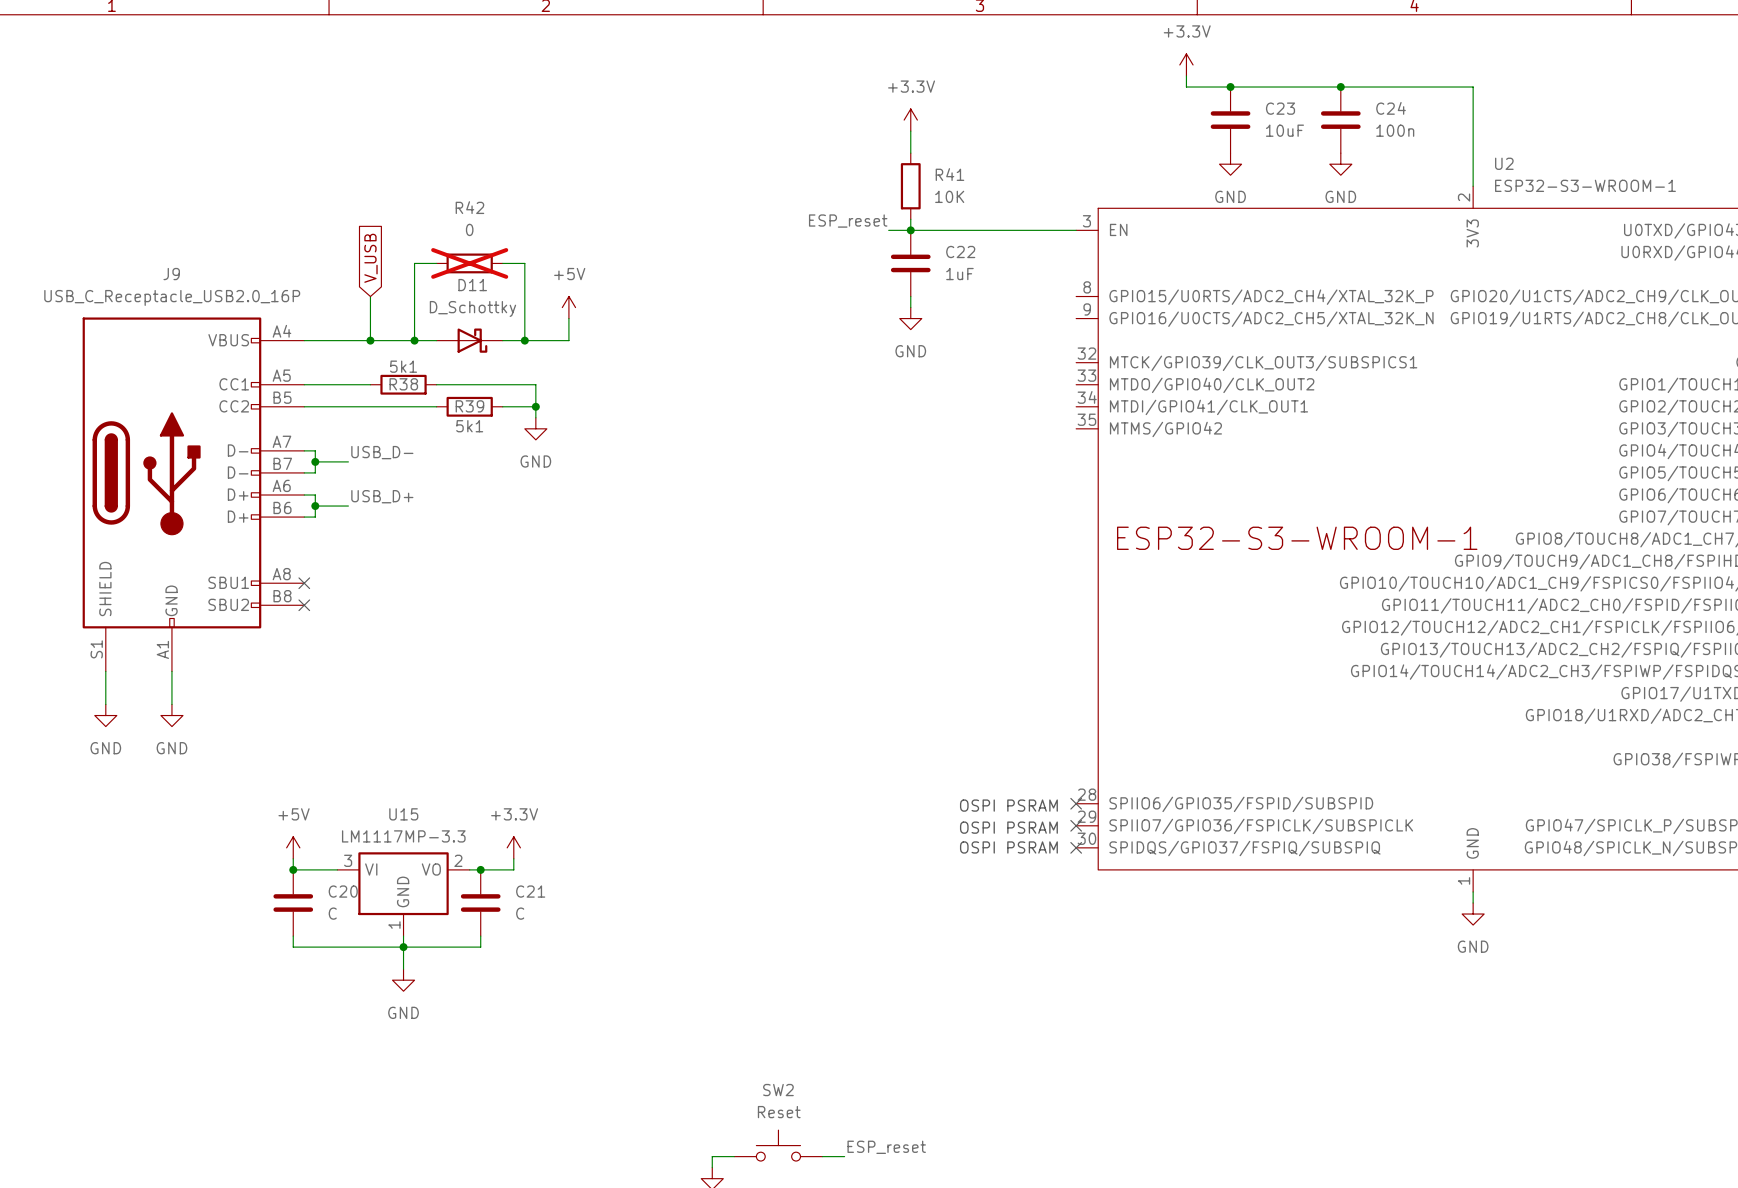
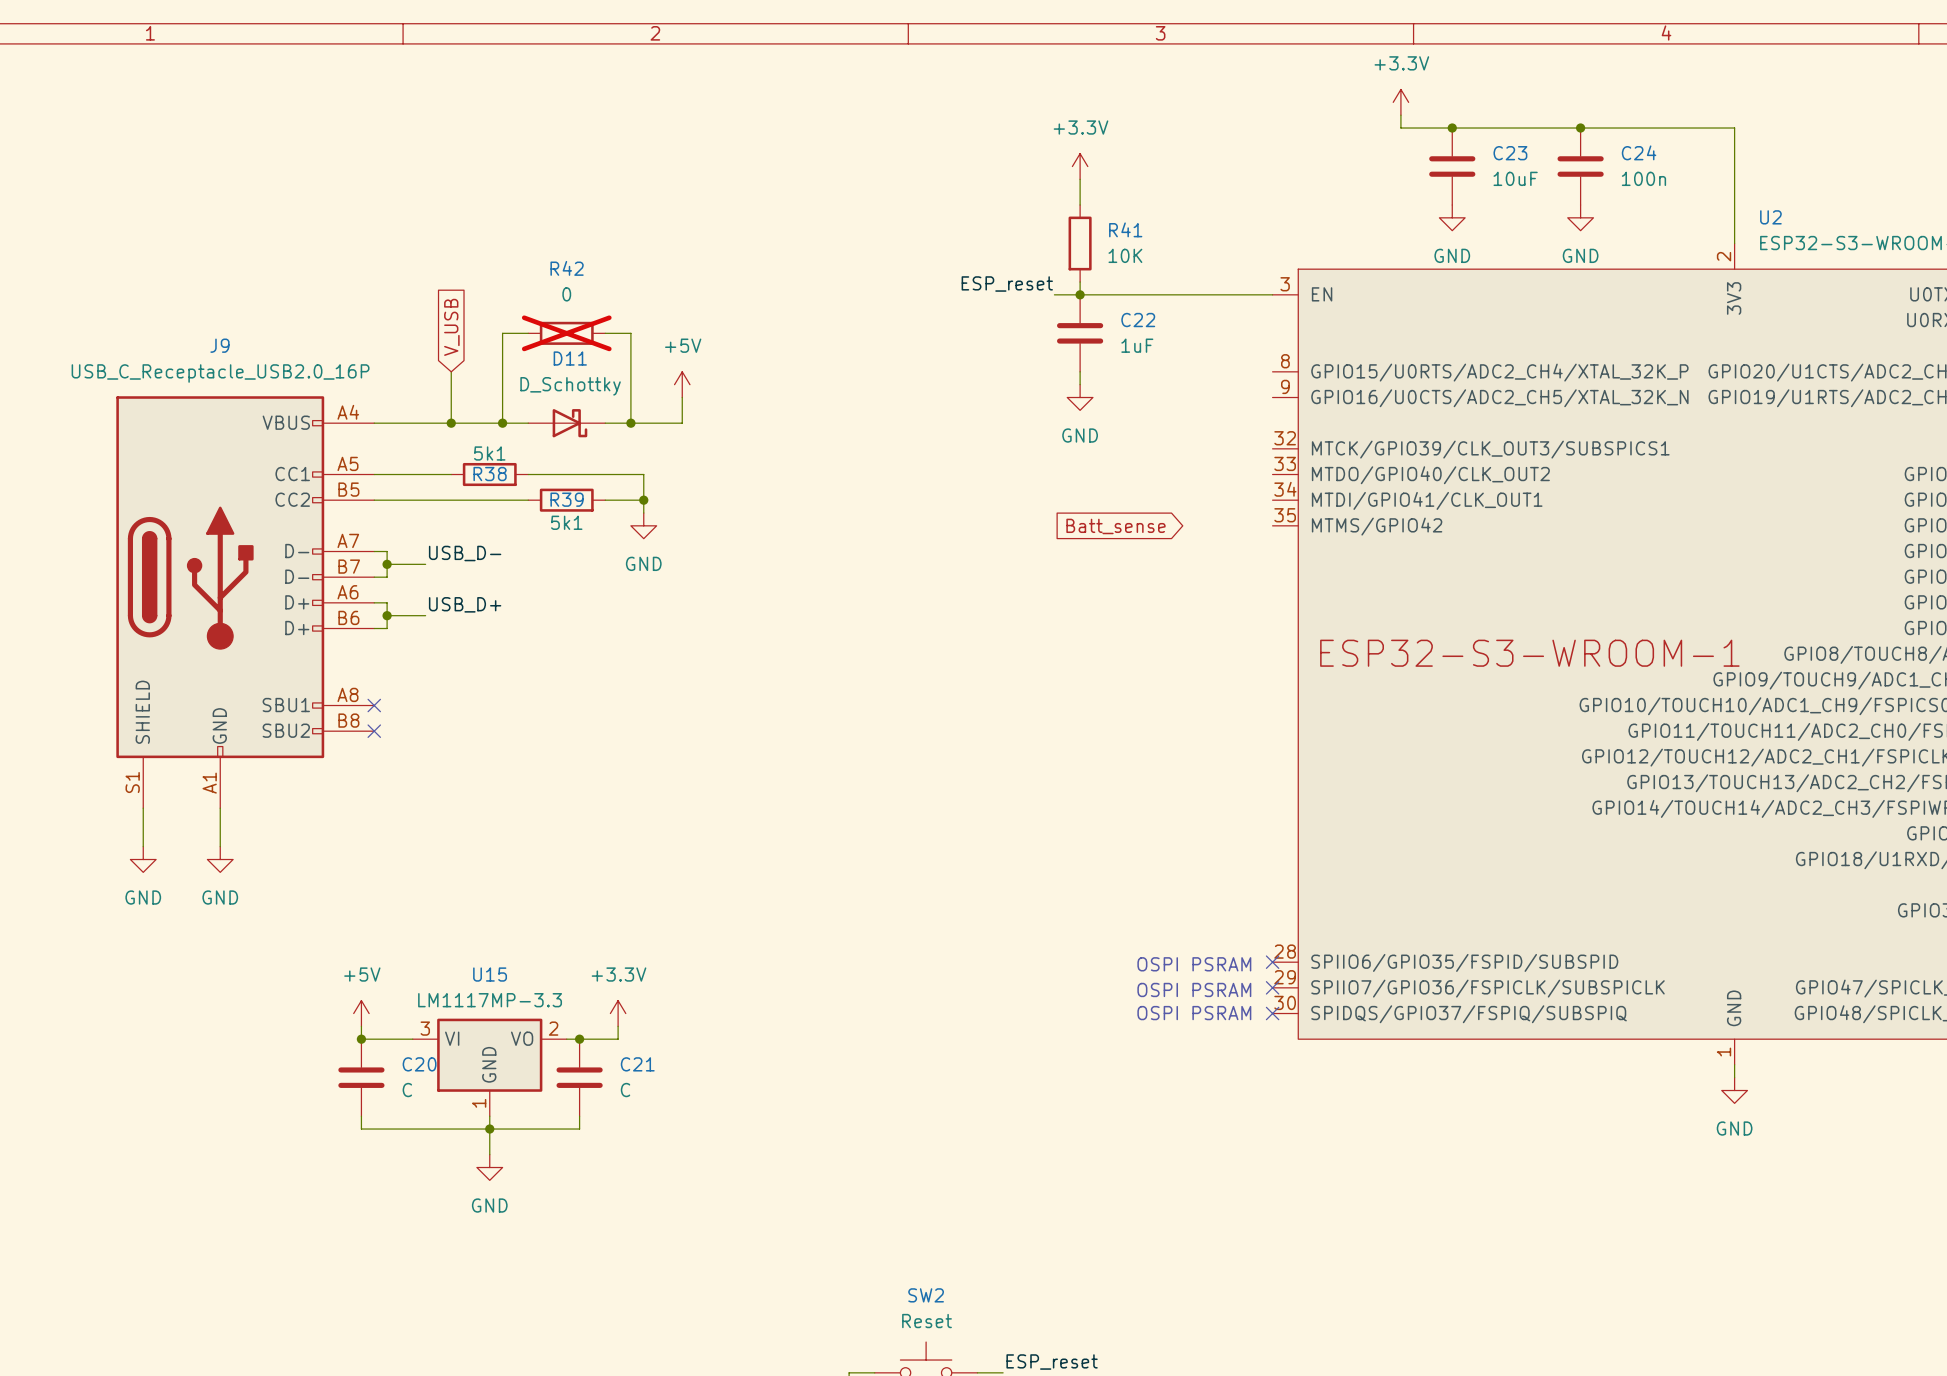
global label: none -> Batt_sense (1115, 526)

